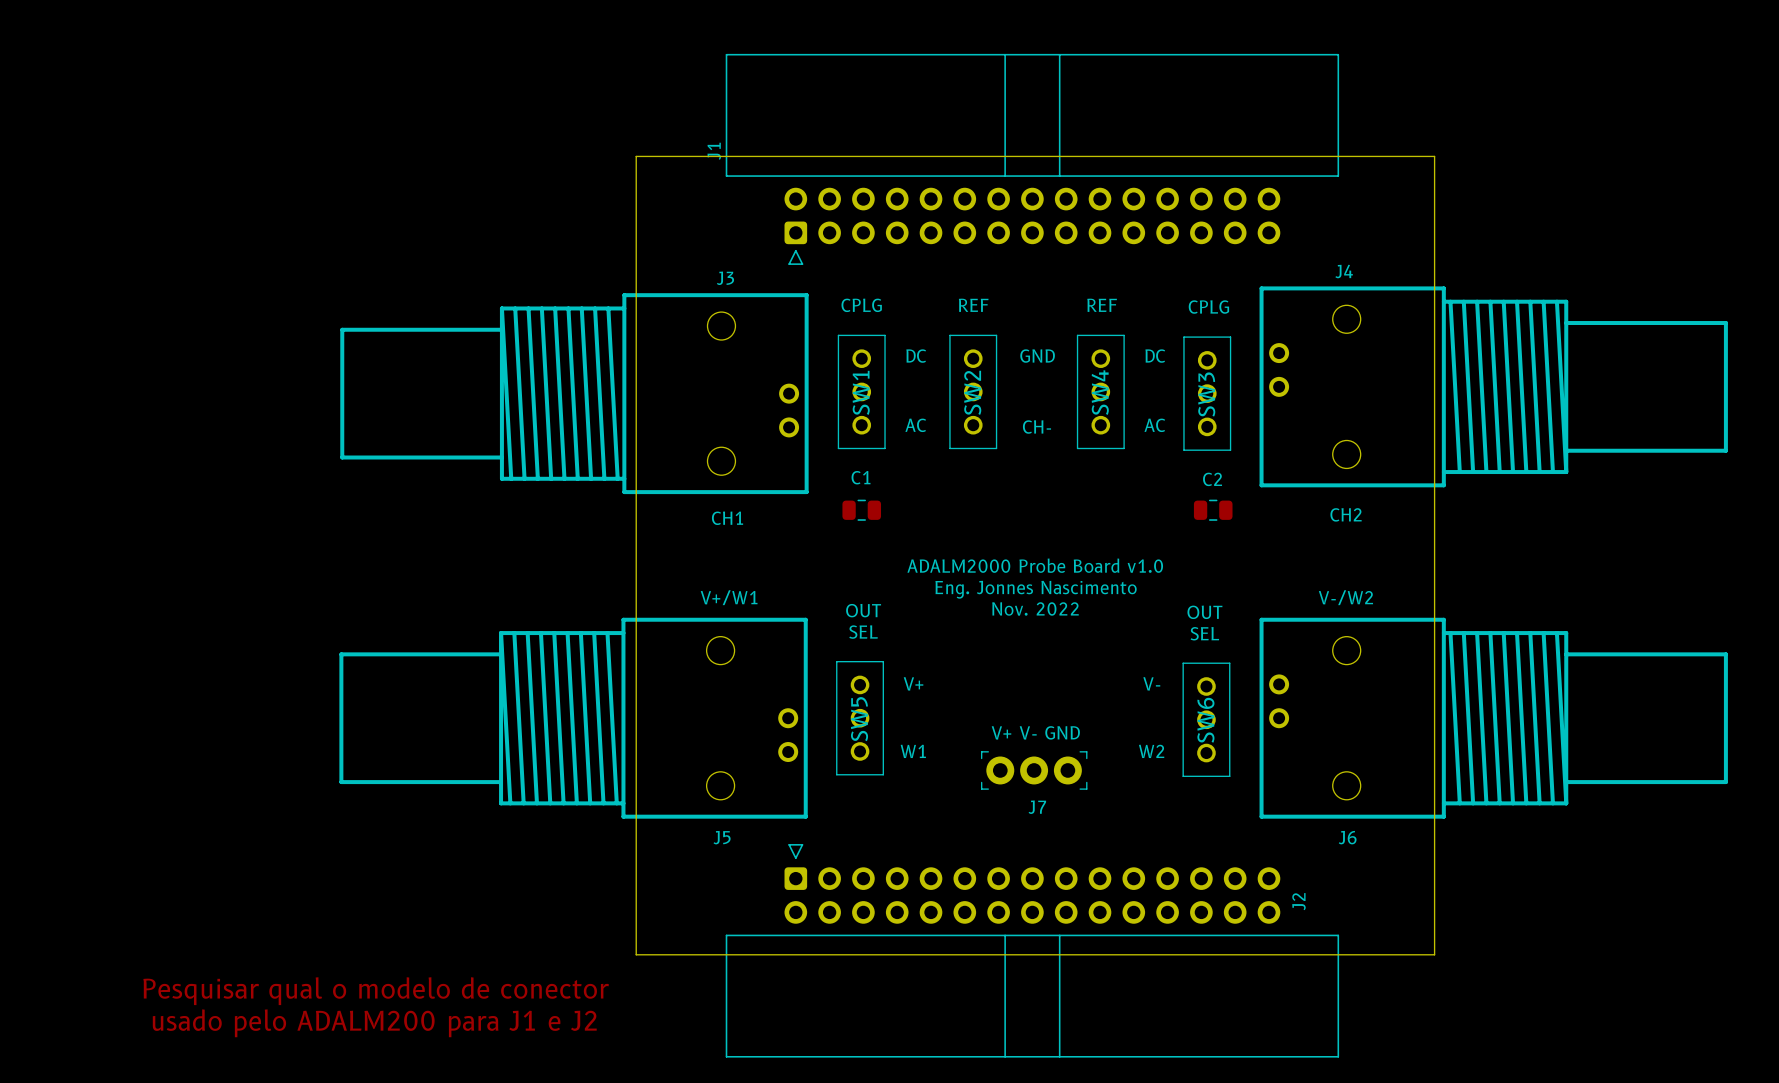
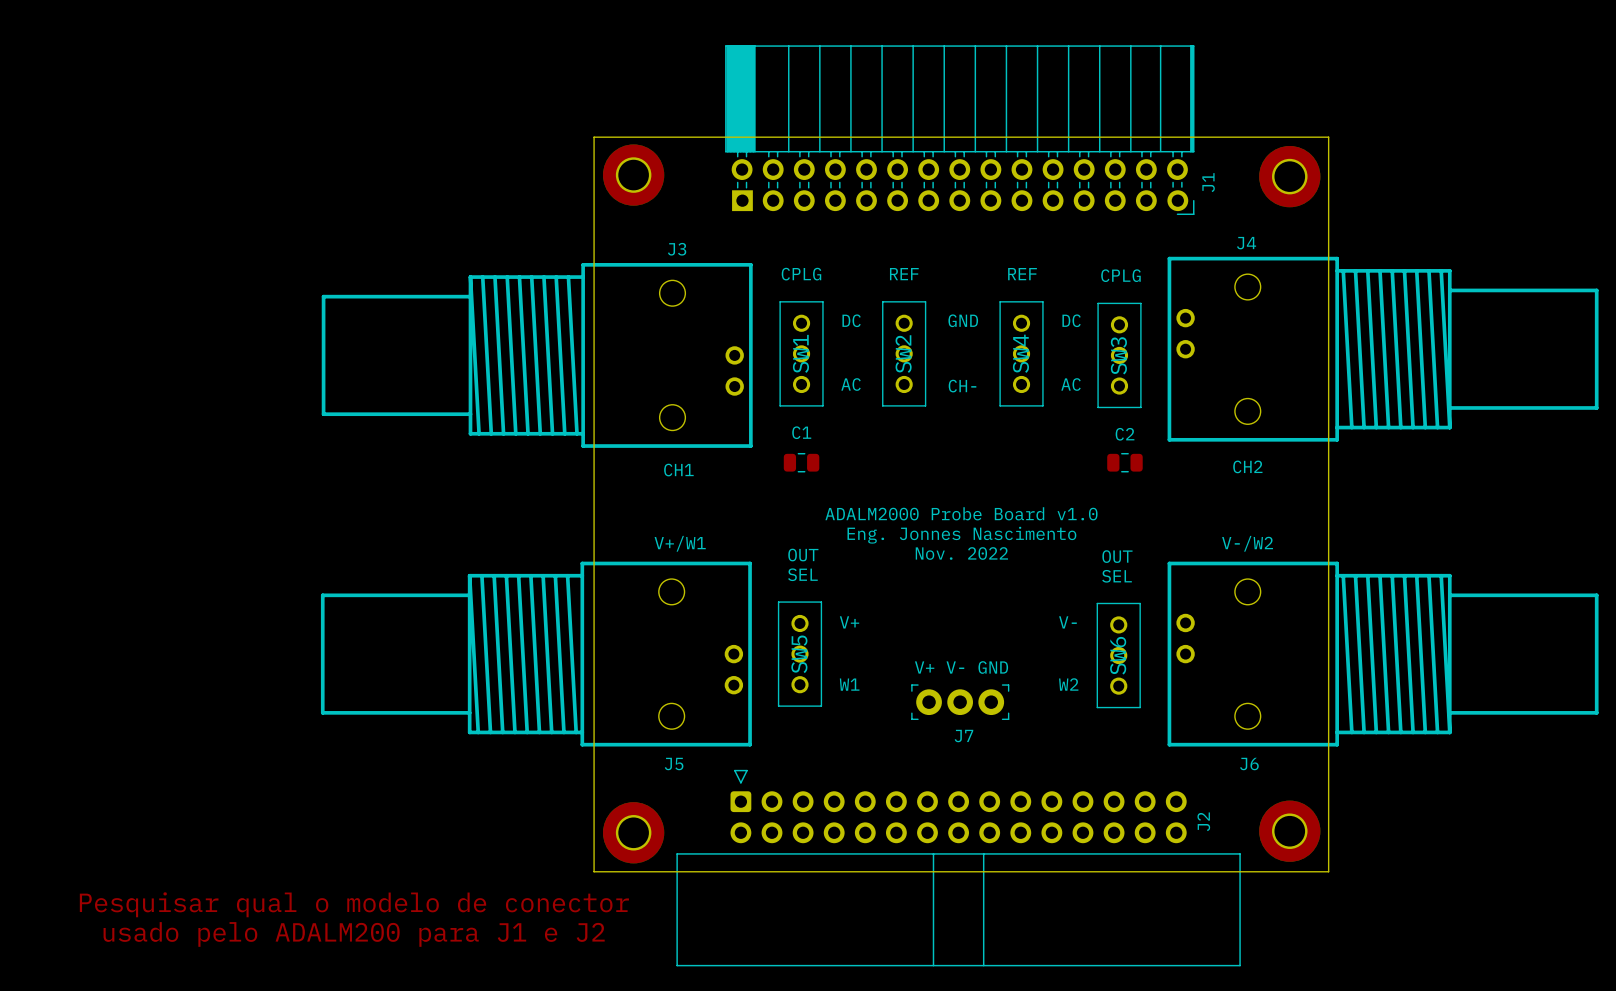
J1 footprint: [725, 53, 1340, 265] -> [725, 45, 1195, 216]
J1 name position: J1 (714, 151) -> J1 (1208, 182)
part: none -> (633, 175)
part: none -> (1289, 176)
part: none -> (1289, 831)
part: none -> (633, 832)

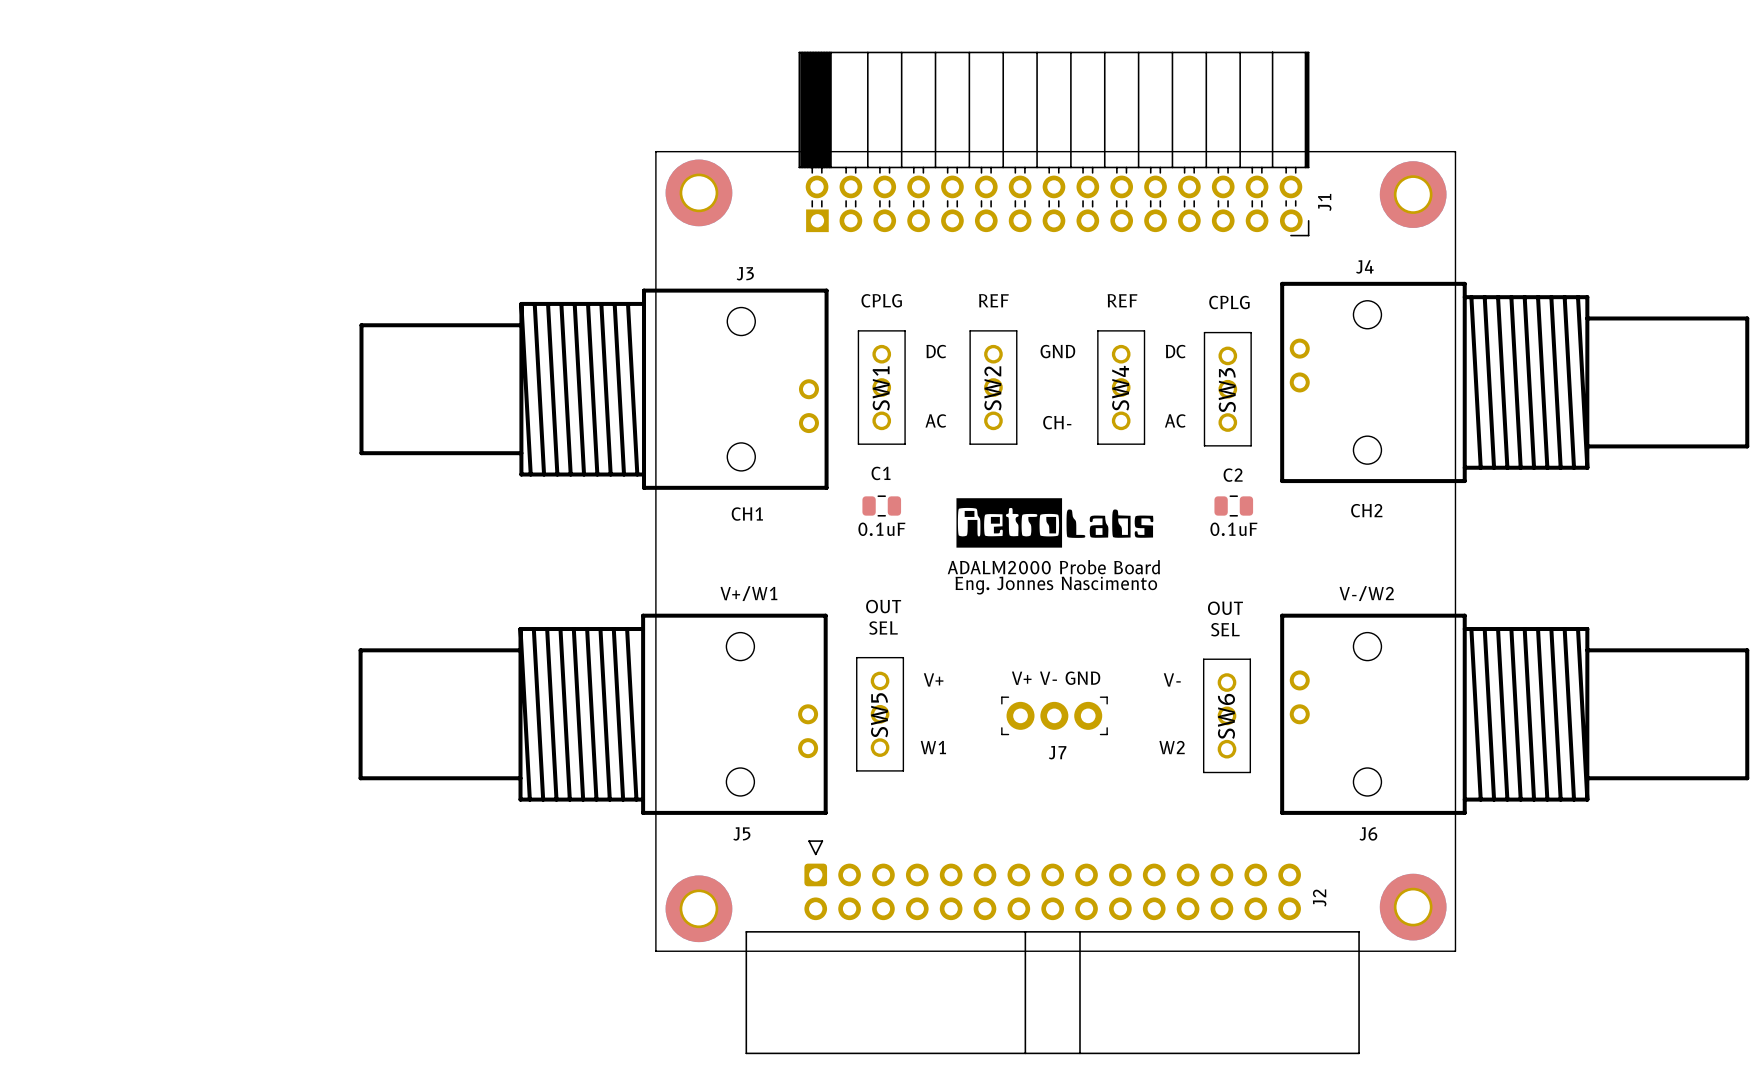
drawing: none -> [956, 498, 1154, 548]
C1 value: none -> 0.1uF (881, 529)
C2 value: none -> 0.1uF (1233, 529)
text: ADALM2000 Probe Board v1.0 (961, 513) -> ADALM2000 Probe Board (1053, 567)
text: Nov. 2022 (961, 553) -> none
text position: V+ V- GND (961, 667) -> V+ V- GND (1056, 678)
J7 position: (960, 702) -> (1054, 715)
text: Pesquisar qual o modelo de conector (354, 904) -> none
text: usado pelo ADALM200 para J1 e J2 (354, 934) -> none

